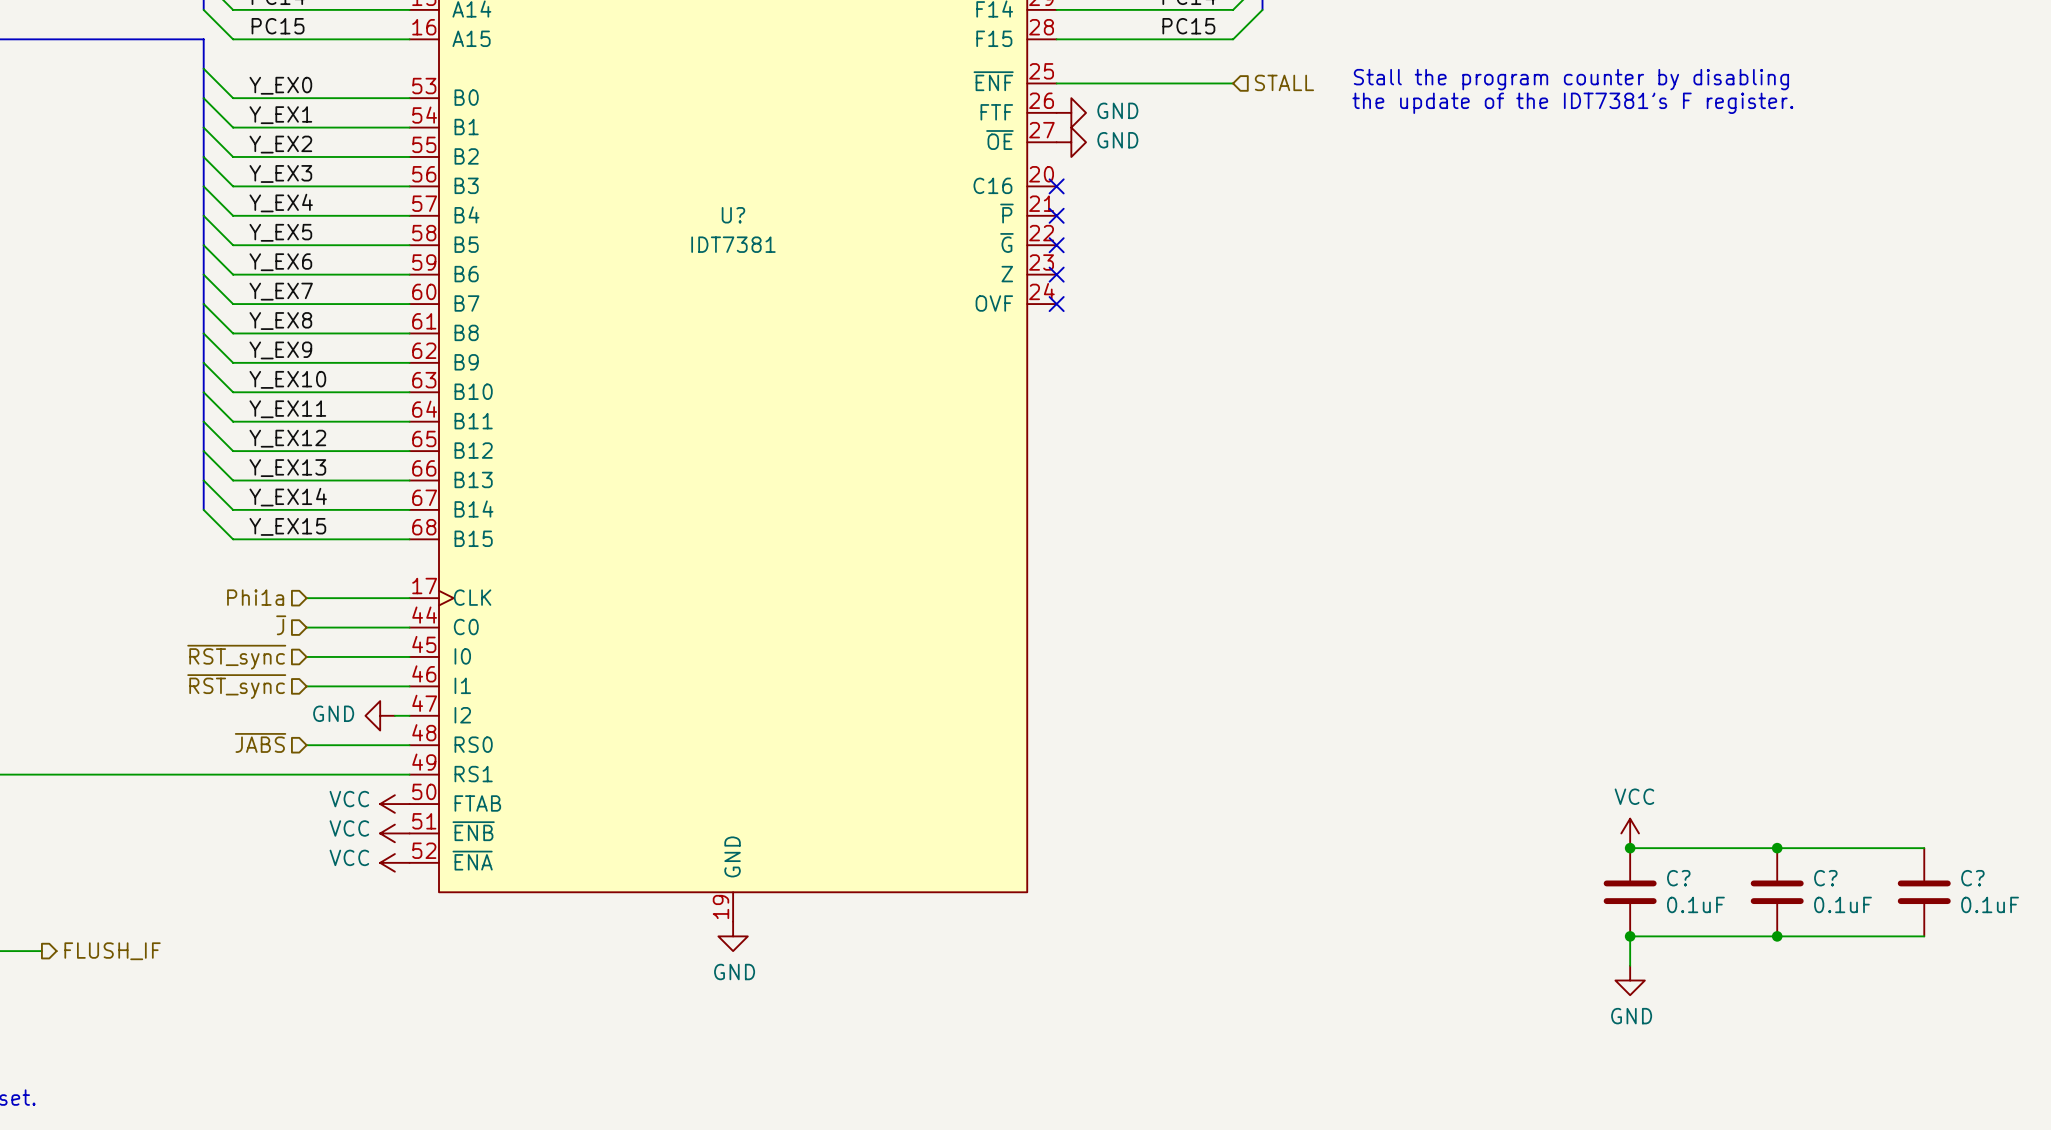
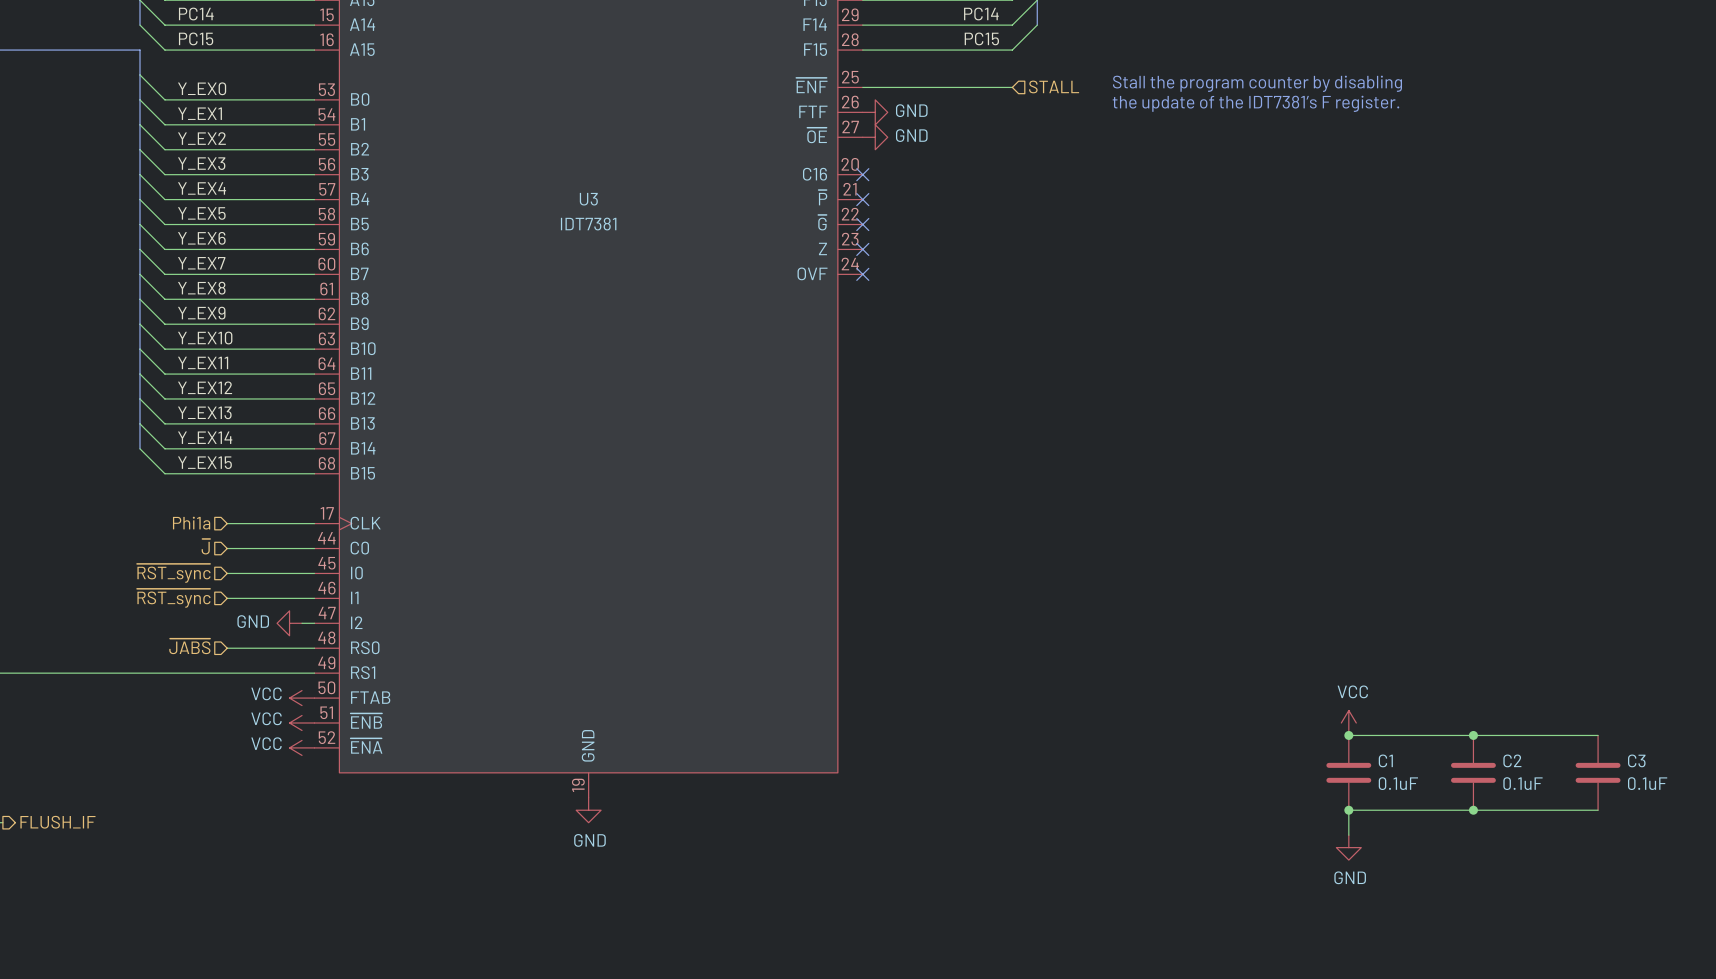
U? name: U? (733, 215) -> U3 (588, 199)
C? name: C? (1678, 878) -> C1 (1385, 760)
C? name: C? (1825, 878) -> C2 (1512, 760)
C? name: C? (1972, 878) -> C3 (1636, 760)

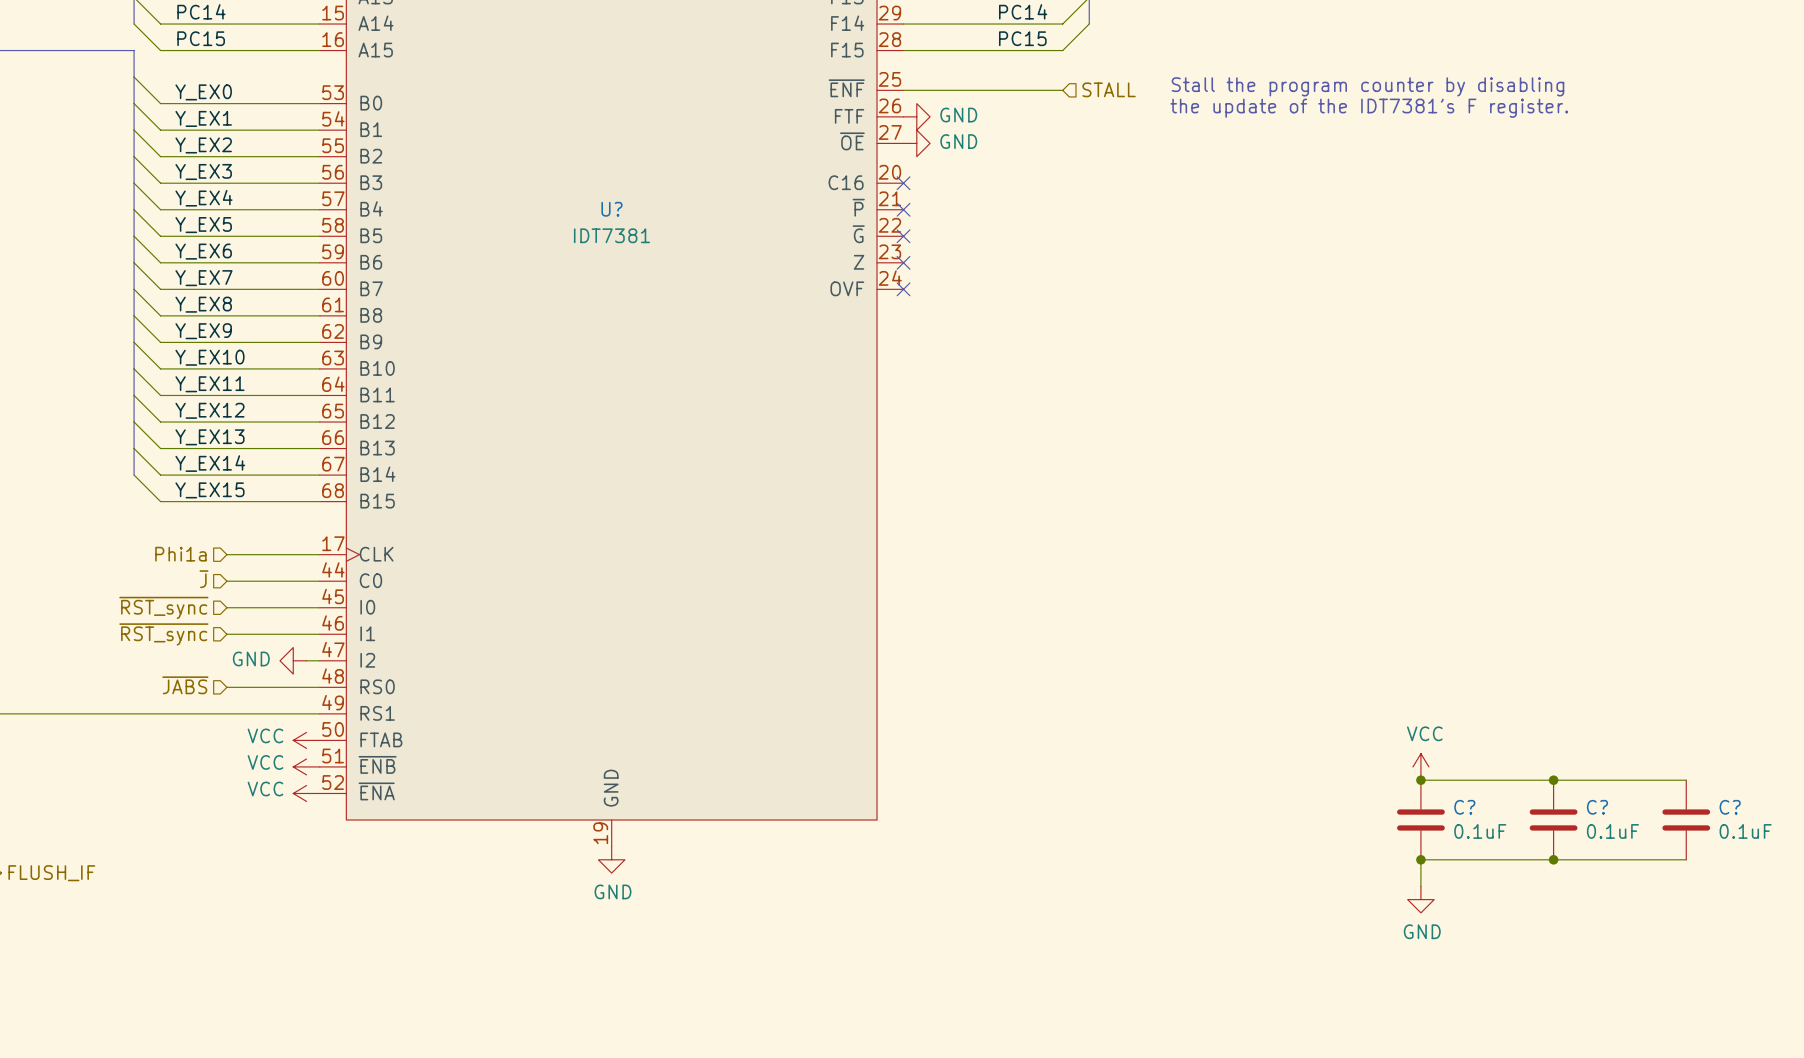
U3 name: U3 (588, 199) -> U? (611, 209)
C1 name: C1 (1385, 760) -> C? (1464, 807)
C2 name: C2 (1512, 760) -> C? (1597, 807)
C3 name: C3 (1636, 760) -> C? (1730, 807)

